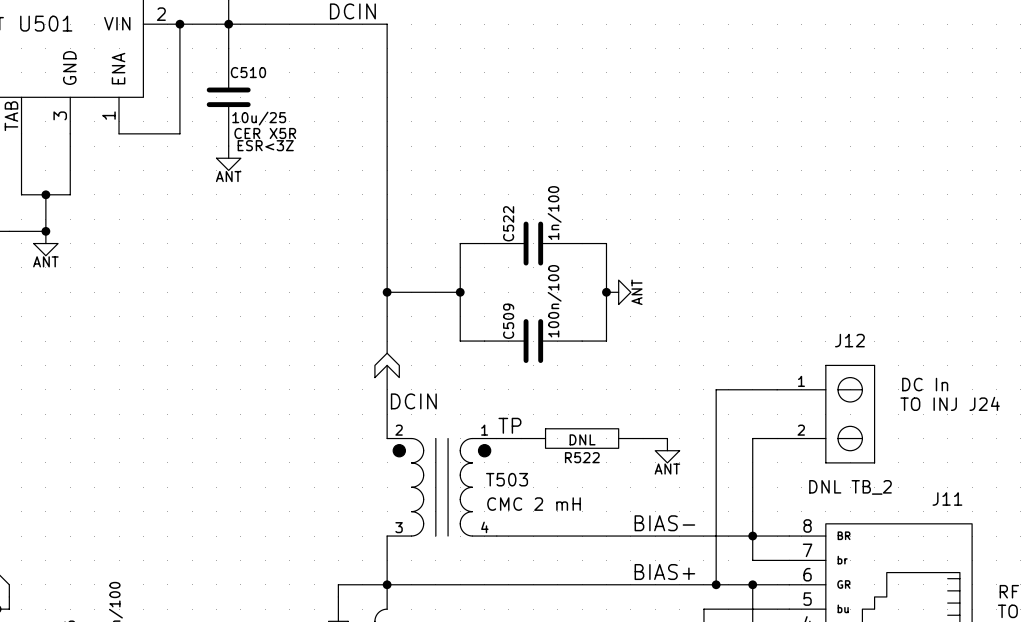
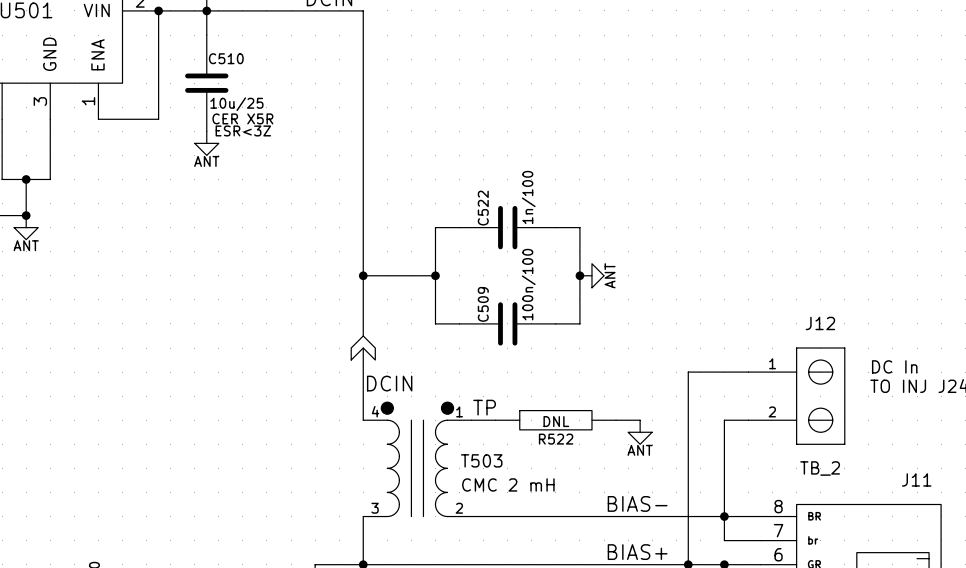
T503 symbol: [387, 438, 497, 537] -> [363, 402, 472, 517]
J12 value: DNL TB_2 (850, 487) -> TB_2 (820, 468)

